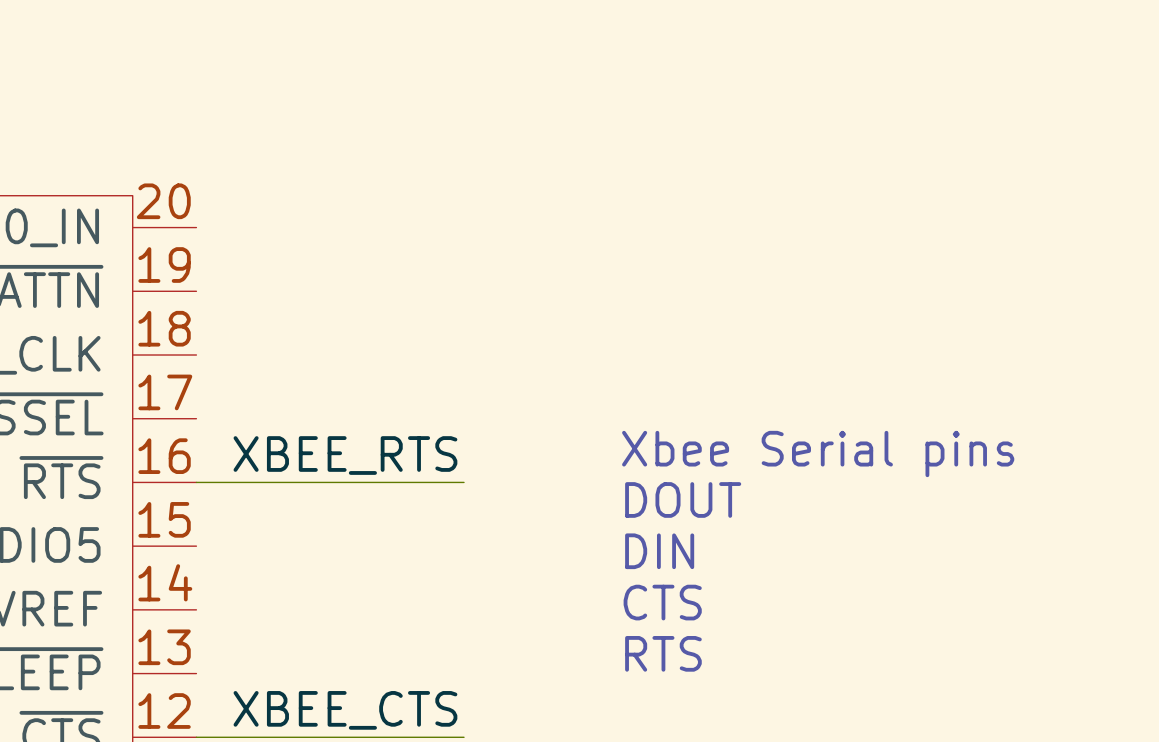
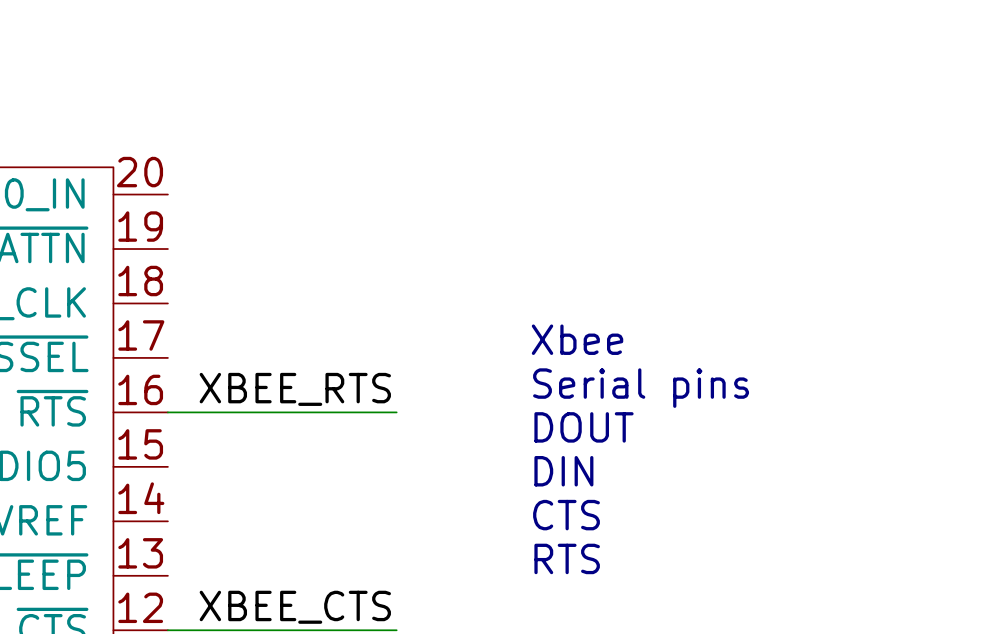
text: none -> Xbee (577, 339)
text: Xbee Serial pins (818, 453) -> Serial pins (641, 388)

